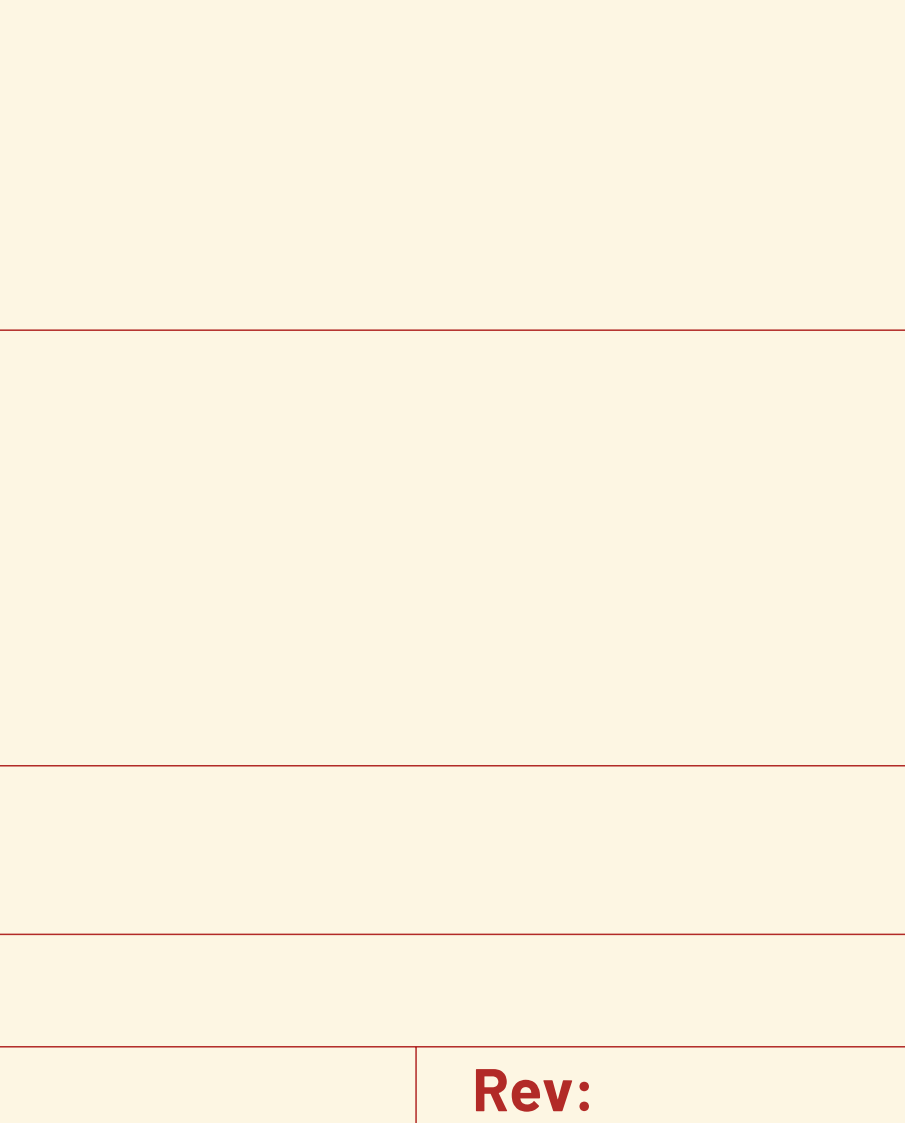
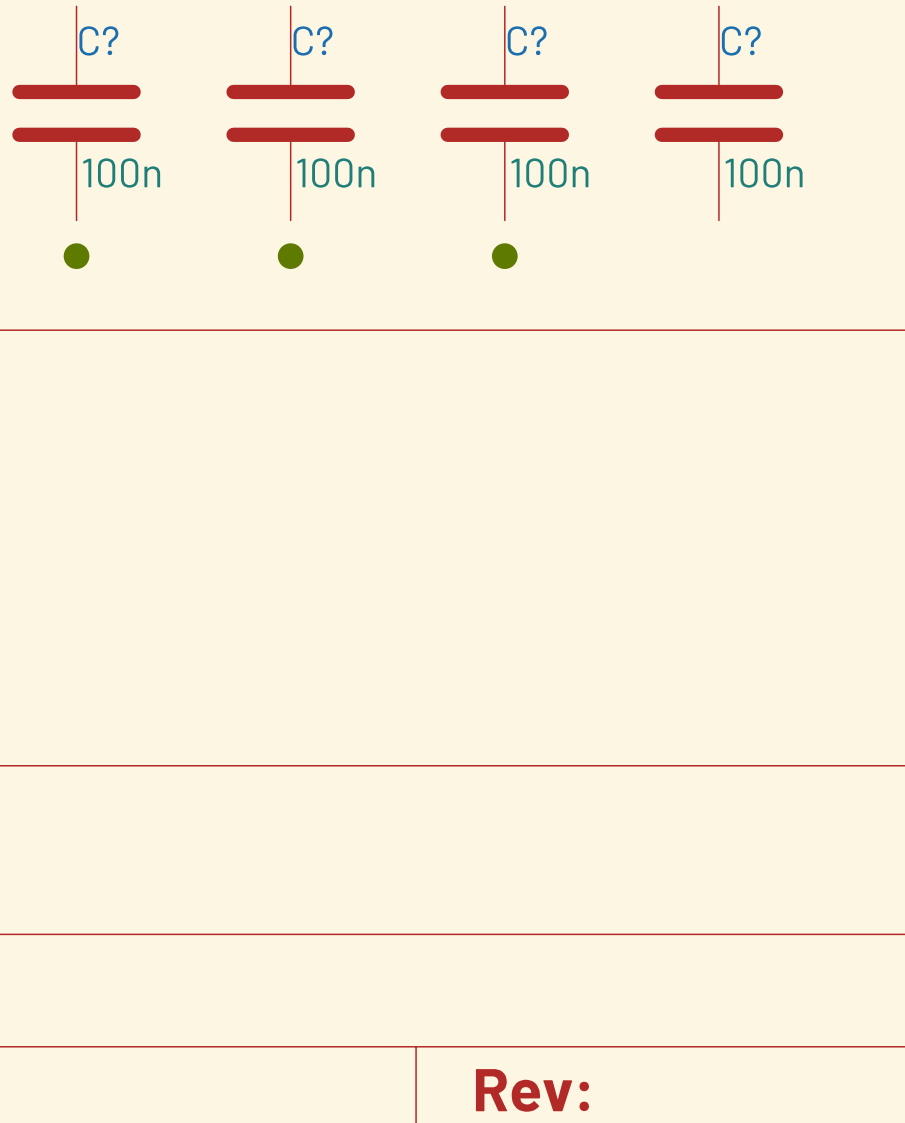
C?: none -> 100n (76, 113)
C?: none -> 100n (290, 113)
C?: none -> 100n (504, 113)
C?: none -> 100n (718, 113)
junction: none -> (76, 256)
junction: none -> (290, 256)
junction: none -> (504, 256)

